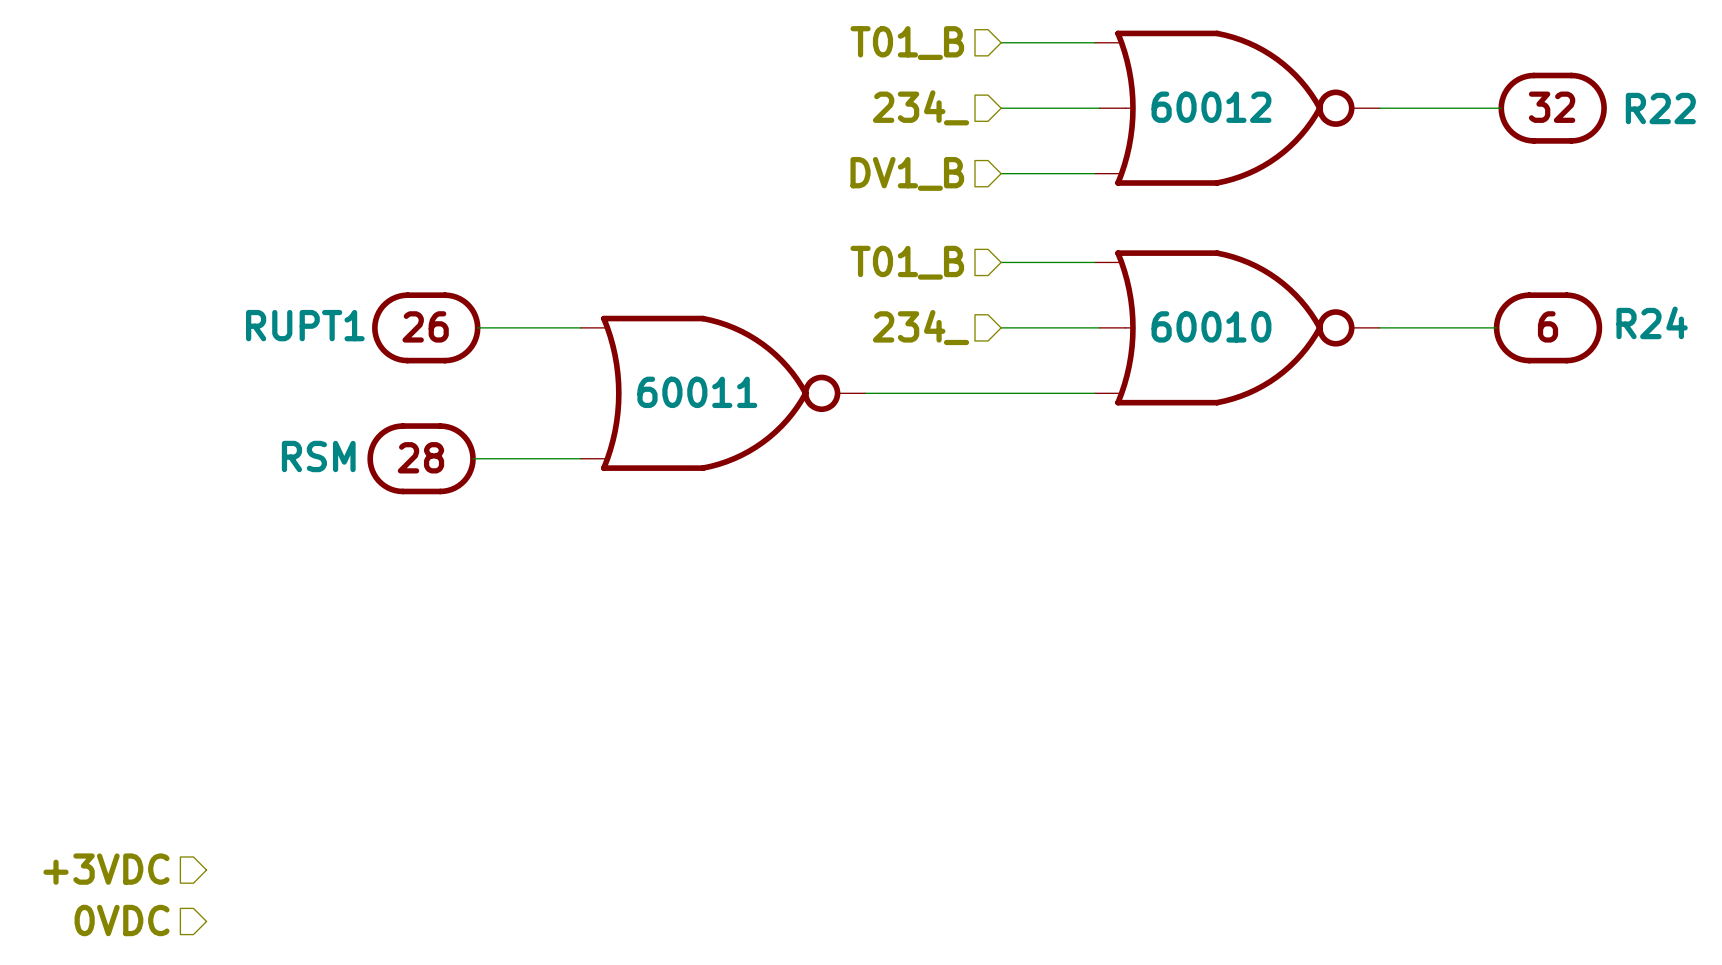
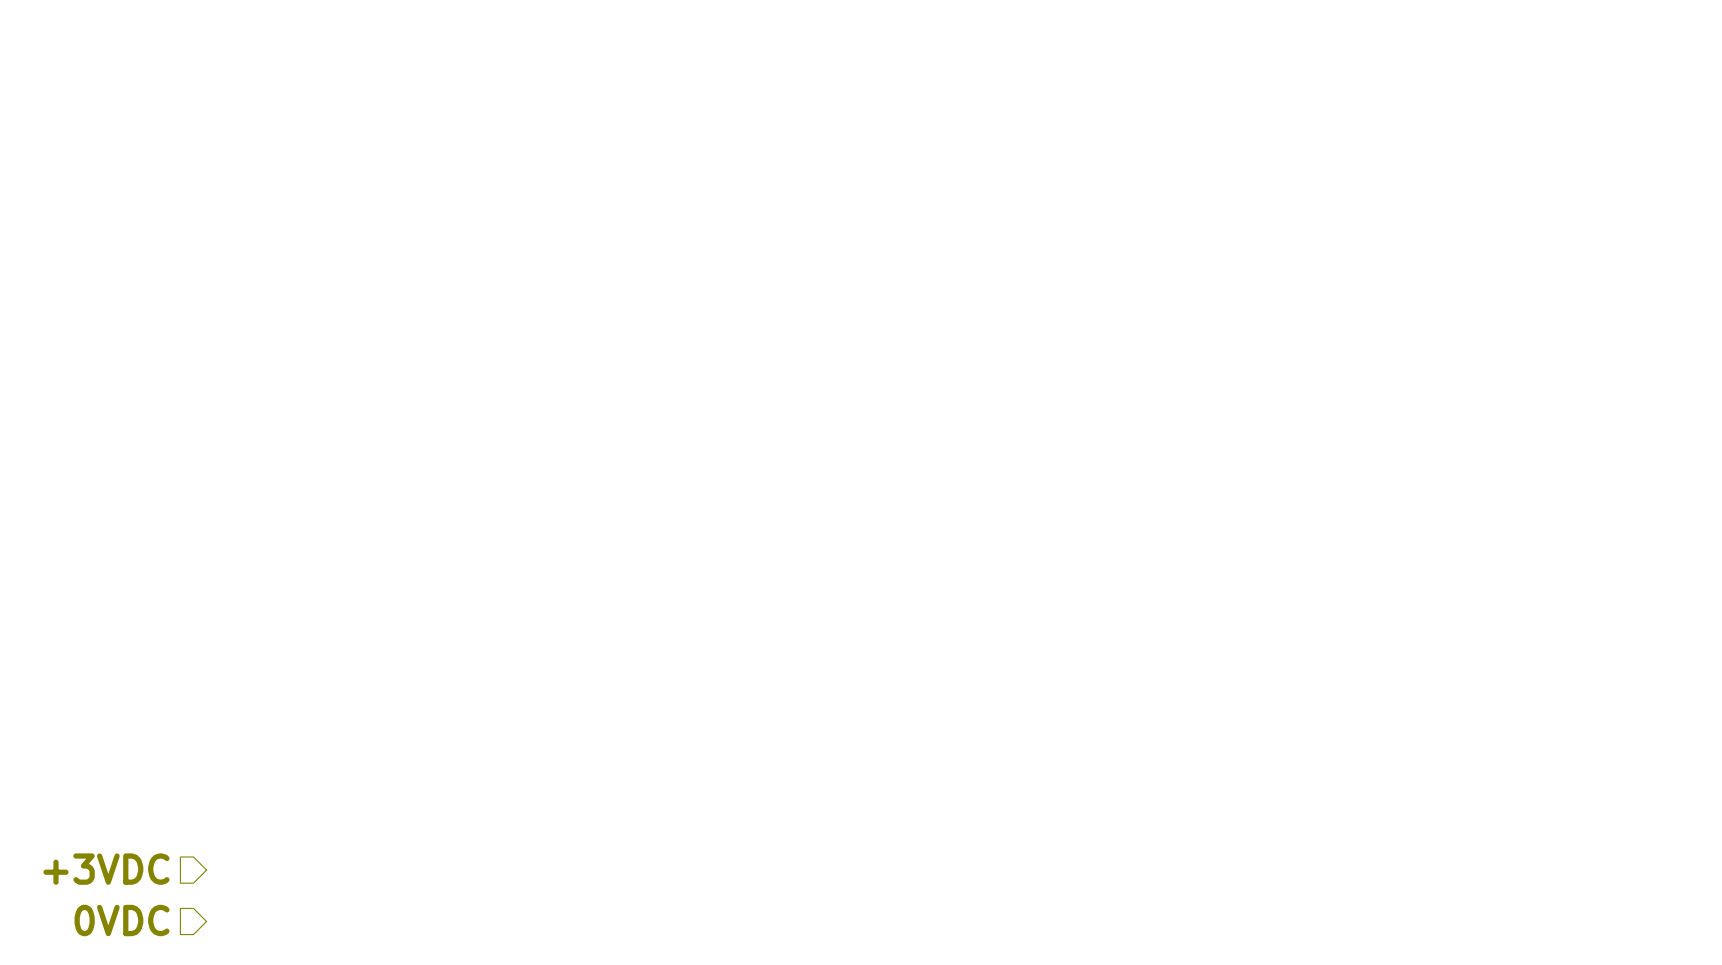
wire: (1001, 42) (1094, 42) -> none
hierarchical label: T01_B (907, 43) -> none
hierarchical label: 234_ (920, 107) -> none
wire: (1001, 108) (1099, 108) -> none
part: (1237, 108) -> none
wire: (1379, 108) (1501, 108) -> none
part: (1552, 108) -> none
hierarchical label: DV1_B (907, 173) -> none
wire: (1001, 173) (1094, 173) -> none
hierarchical label: T01_B (907, 262) -> none
wire: (1001, 262) (1094, 262) -> none
part: (426, 327) -> none
wire: (477, 327) (580, 327) -> none
hierarchical label: 234_ (920, 327) -> none
wire: (1001, 327) (1099, 327) -> none
part: (1237, 327) -> none
wire: (1379, 327) (1496, 327) -> none
part: (1548, 327) -> none
part: (723, 393) -> none
wire: (865, 393) (1094, 393) -> none
part: (421, 458) -> none
wire: (472, 458) (580, 458) -> none

